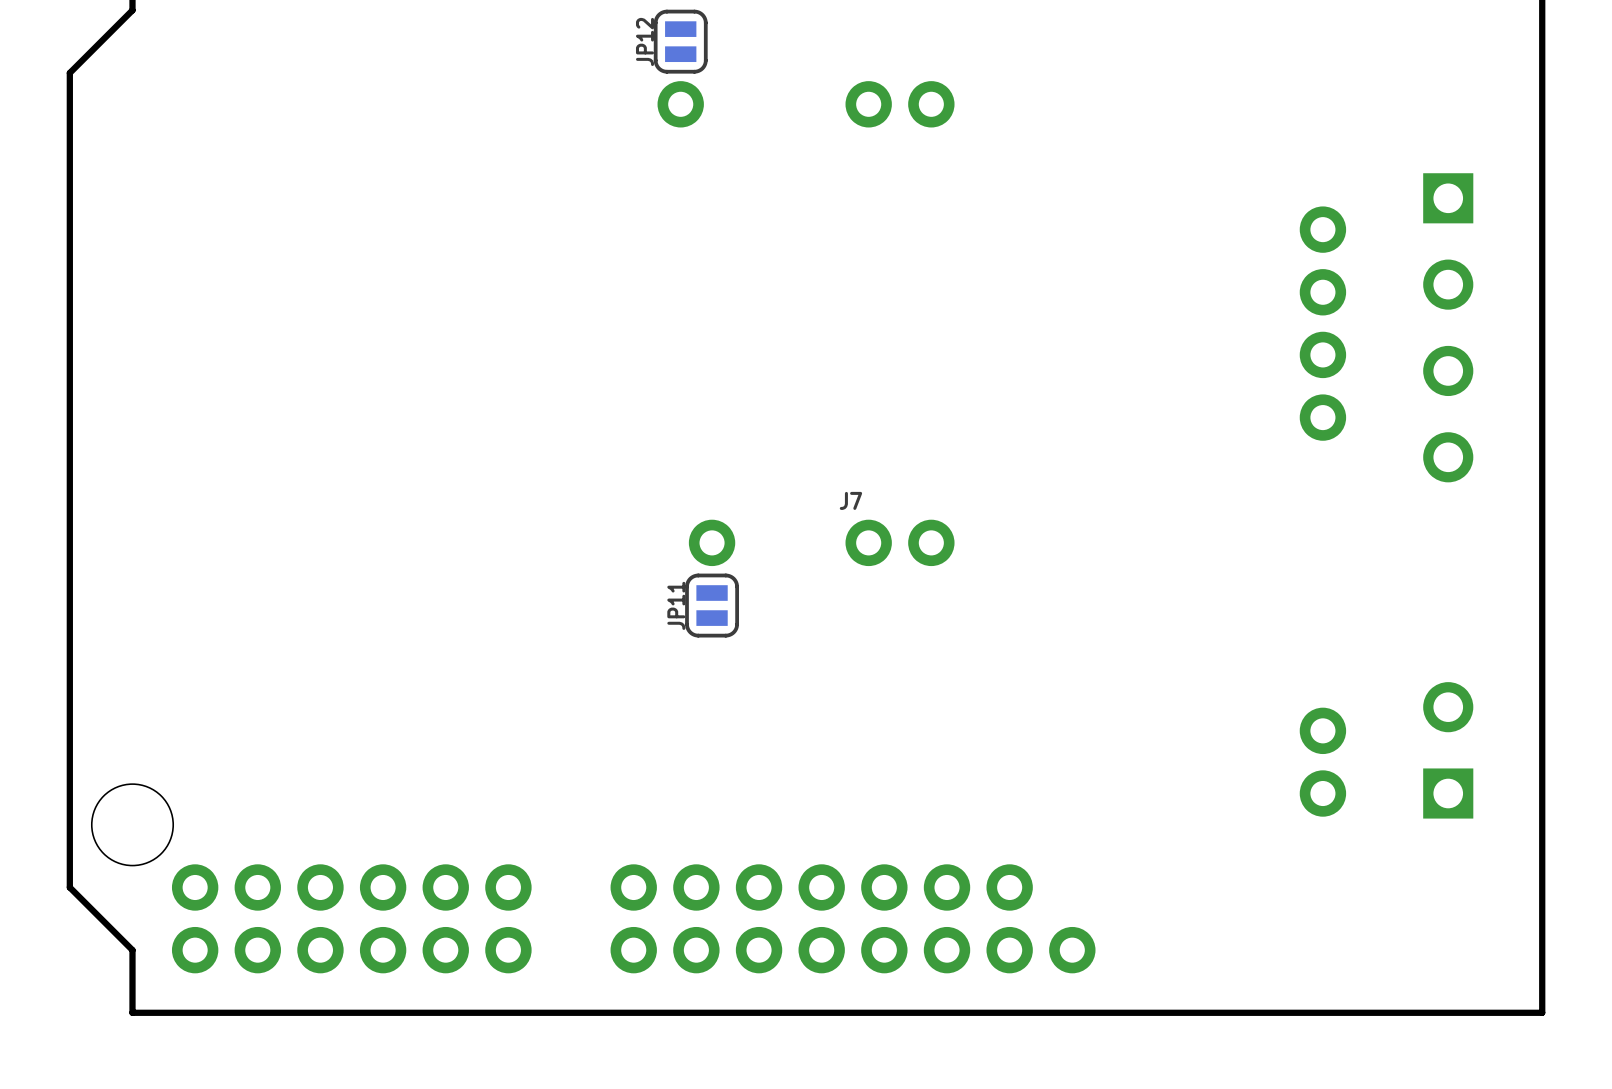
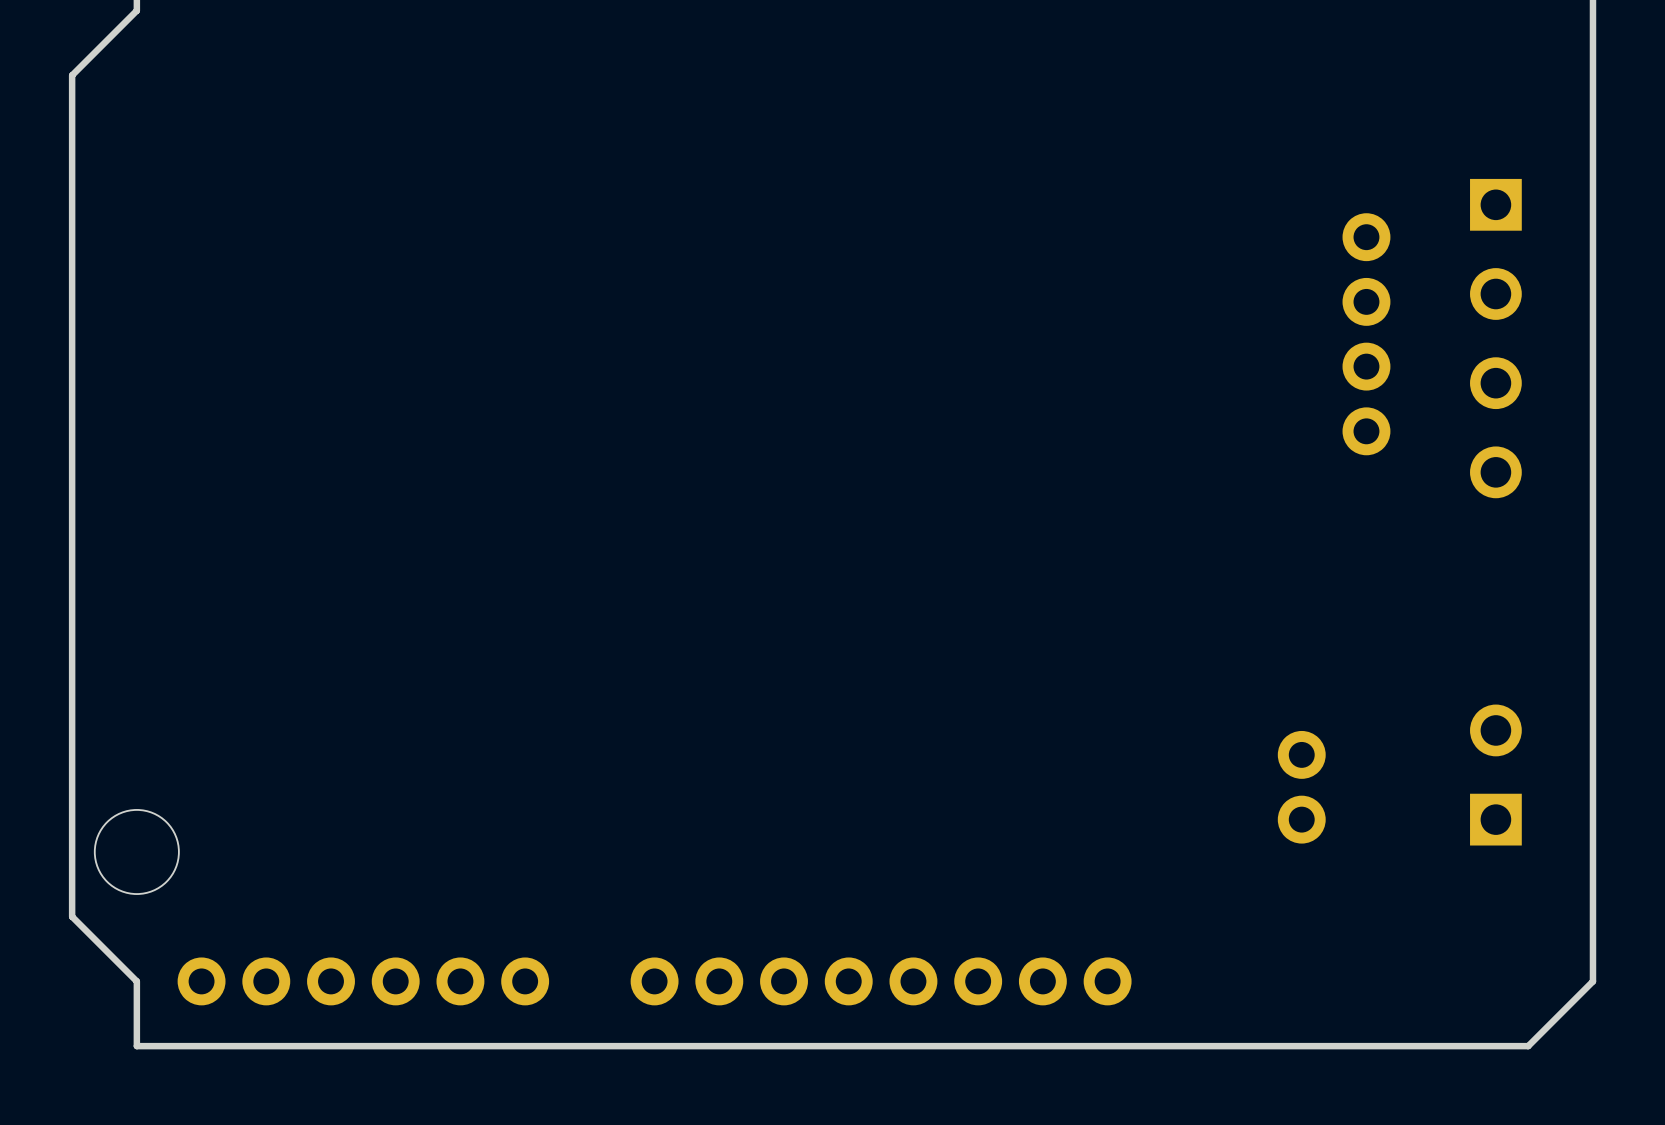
JP12: (680, 41) -> none
part: (680, 104) -> none
part: (900, 104) -> none
part: (712, 542) -> none
J7: (900, 542) -> none
JP11: (712, 605) -> none
part position: (1322, 762) -> (1301, 787)
part: (351, 887) -> none
part: (821, 887) -> none
board edge: (1542, 950) (1542, 1012) (1479, 1012) -> (1592, 981) (1528, 1046)

